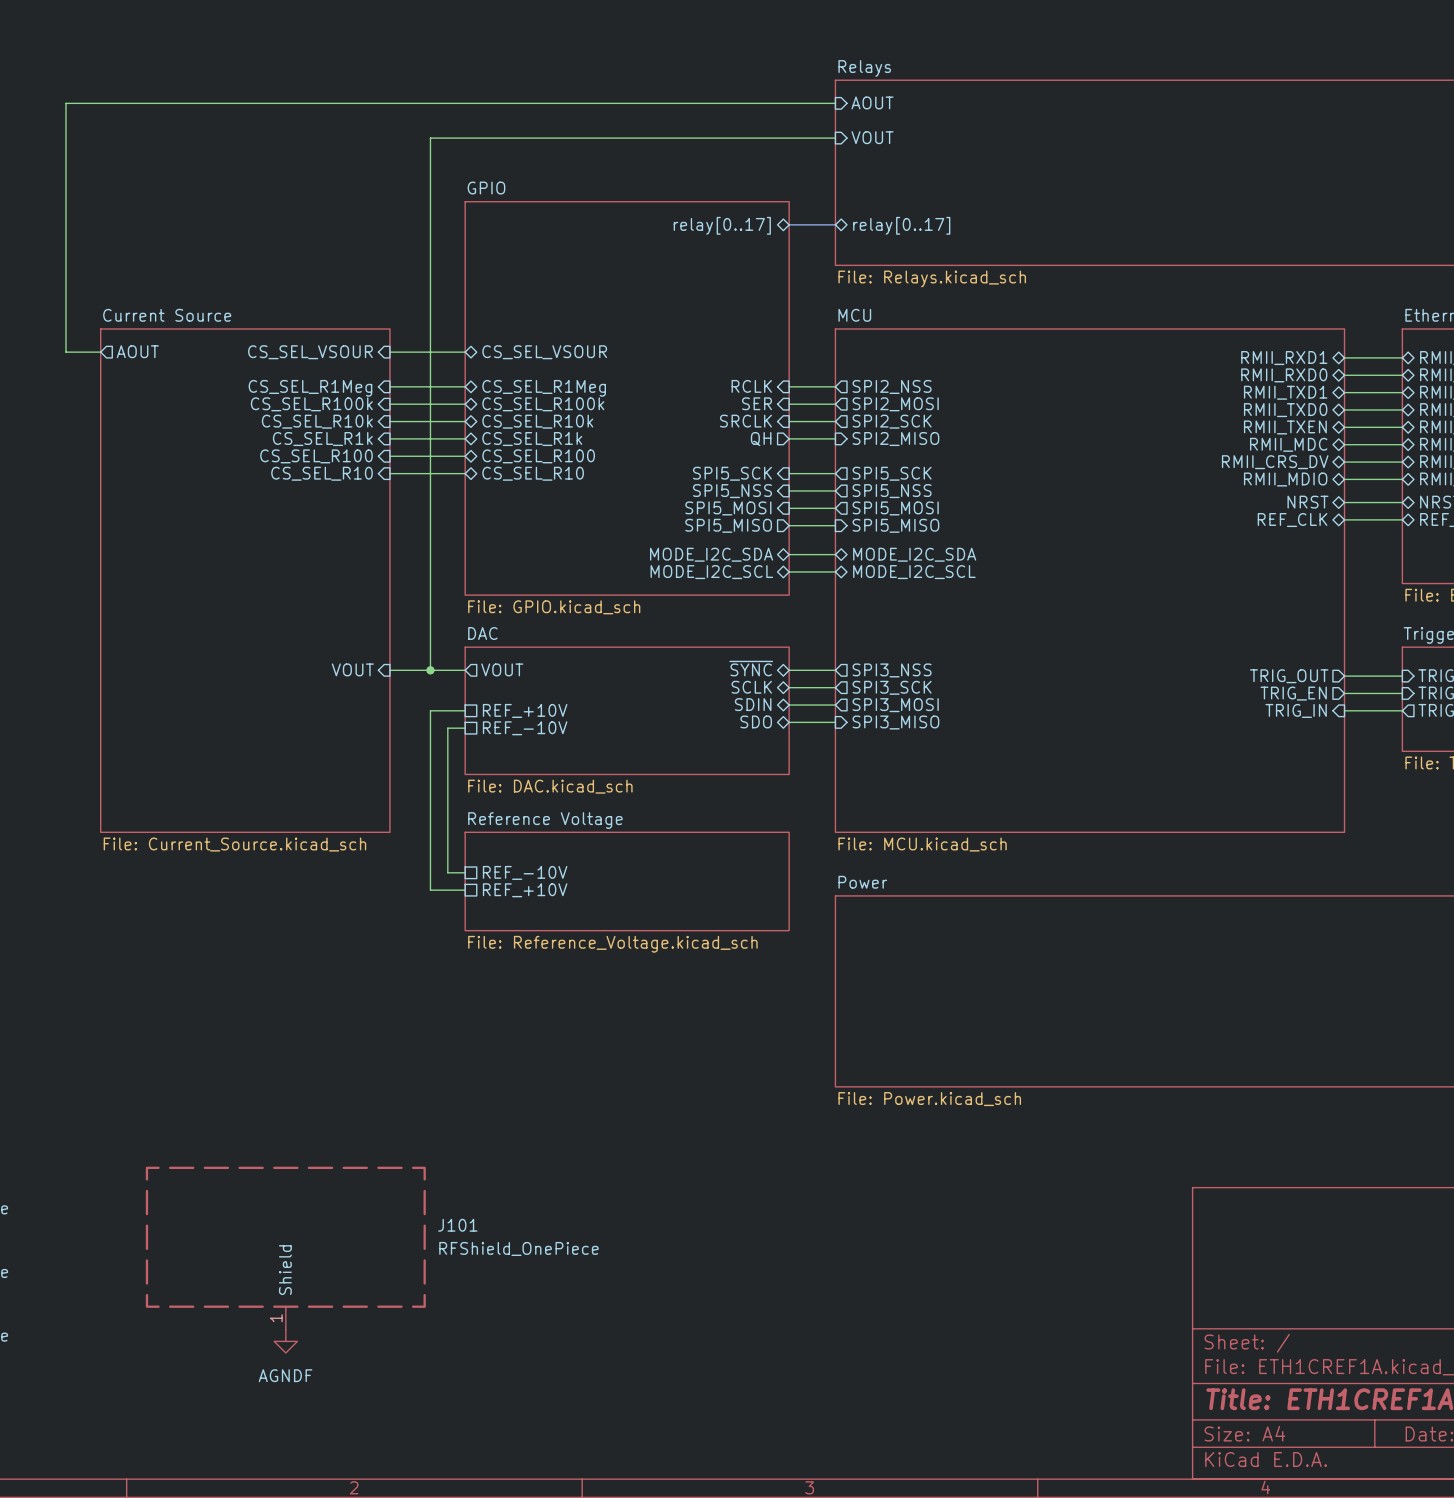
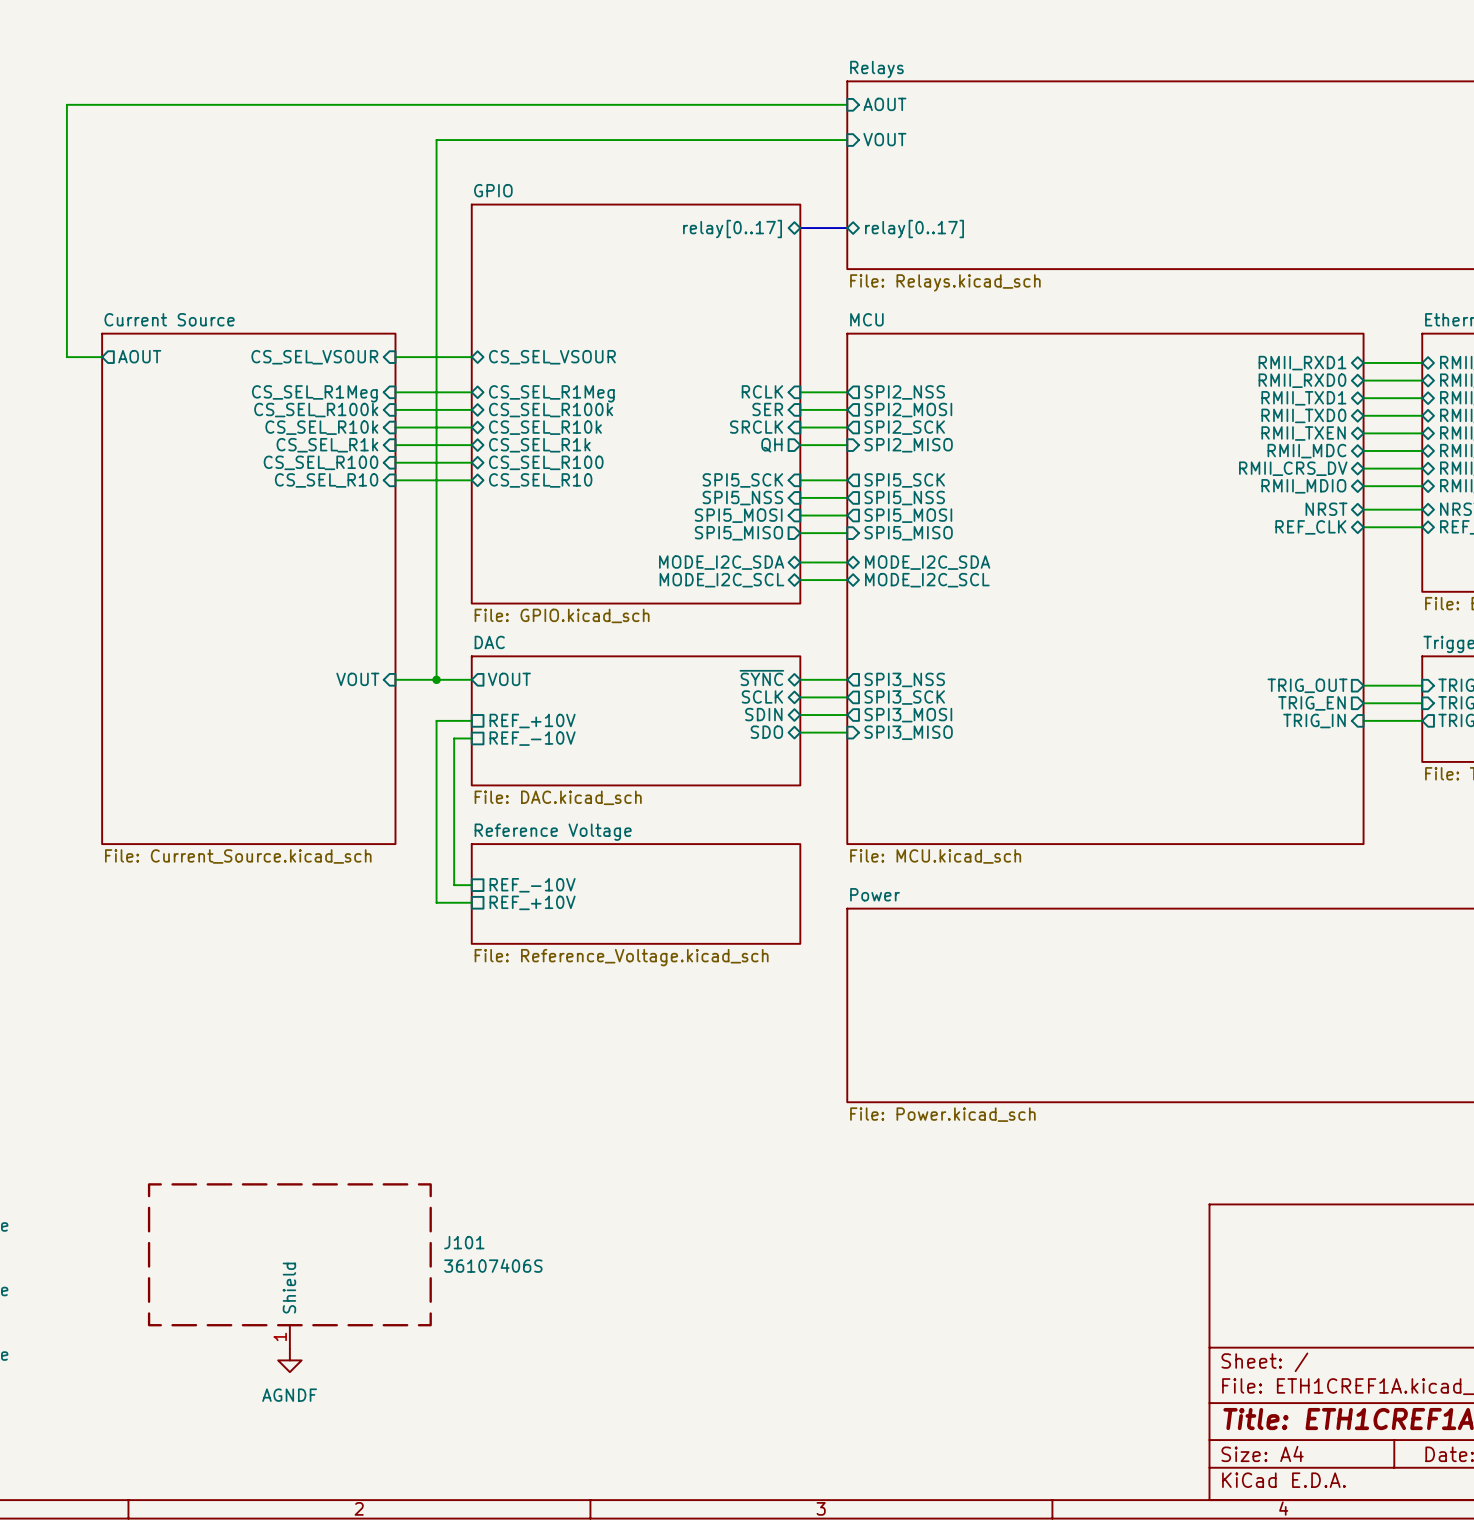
J101 value: RFShield_OnePiece (518, 1248) -> 36107406S (493, 1265)

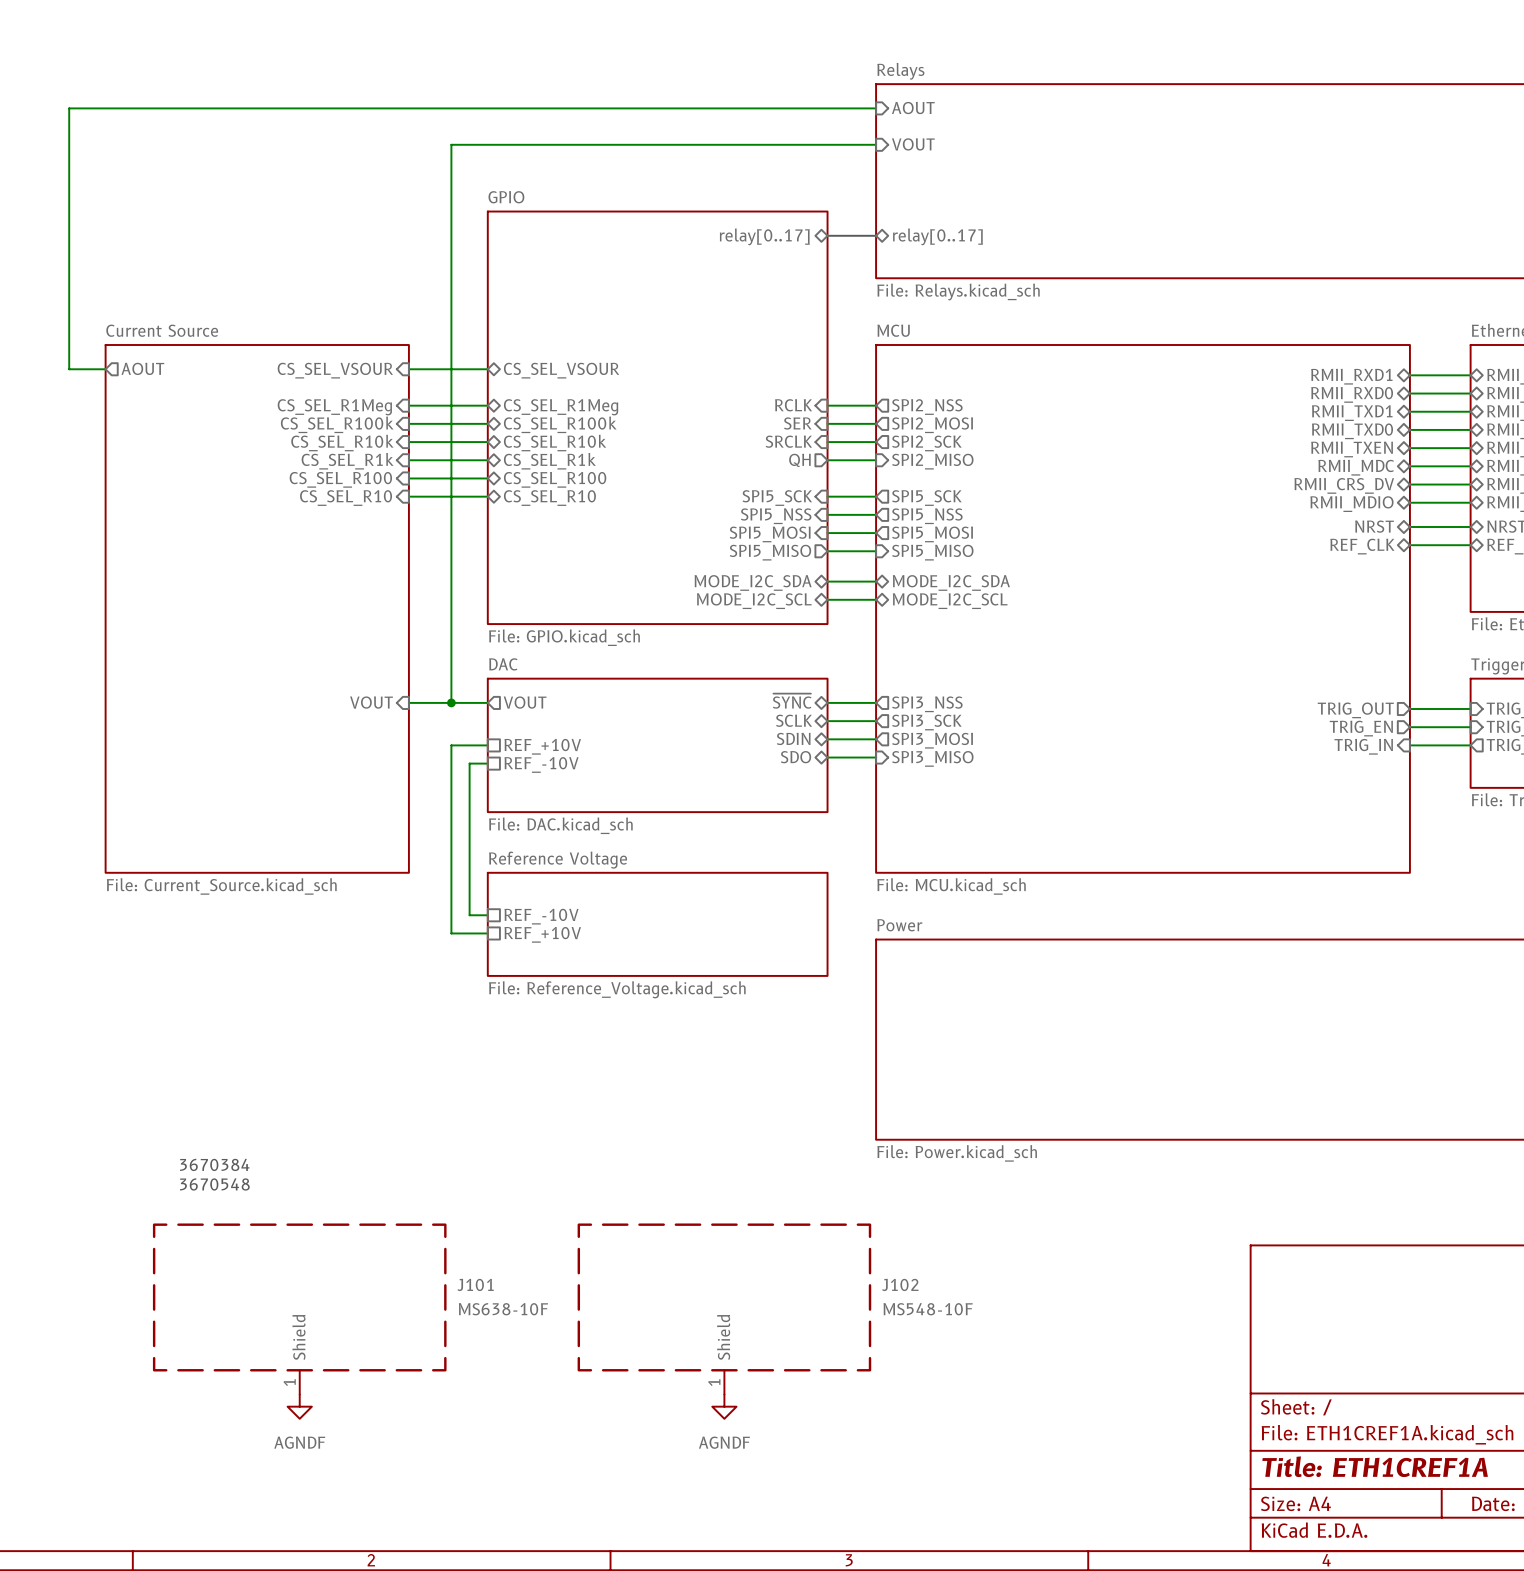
text: none -> 3670384 (214, 1164)
text: none -> 3670548 (214, 1184)
J101 value: 36107406S (493, 1265) -> MS638-10F (503, 1309)
J102: none -> MS548-10F (724, 1309)
power symbol: none -> AGNDF (724, 1406)

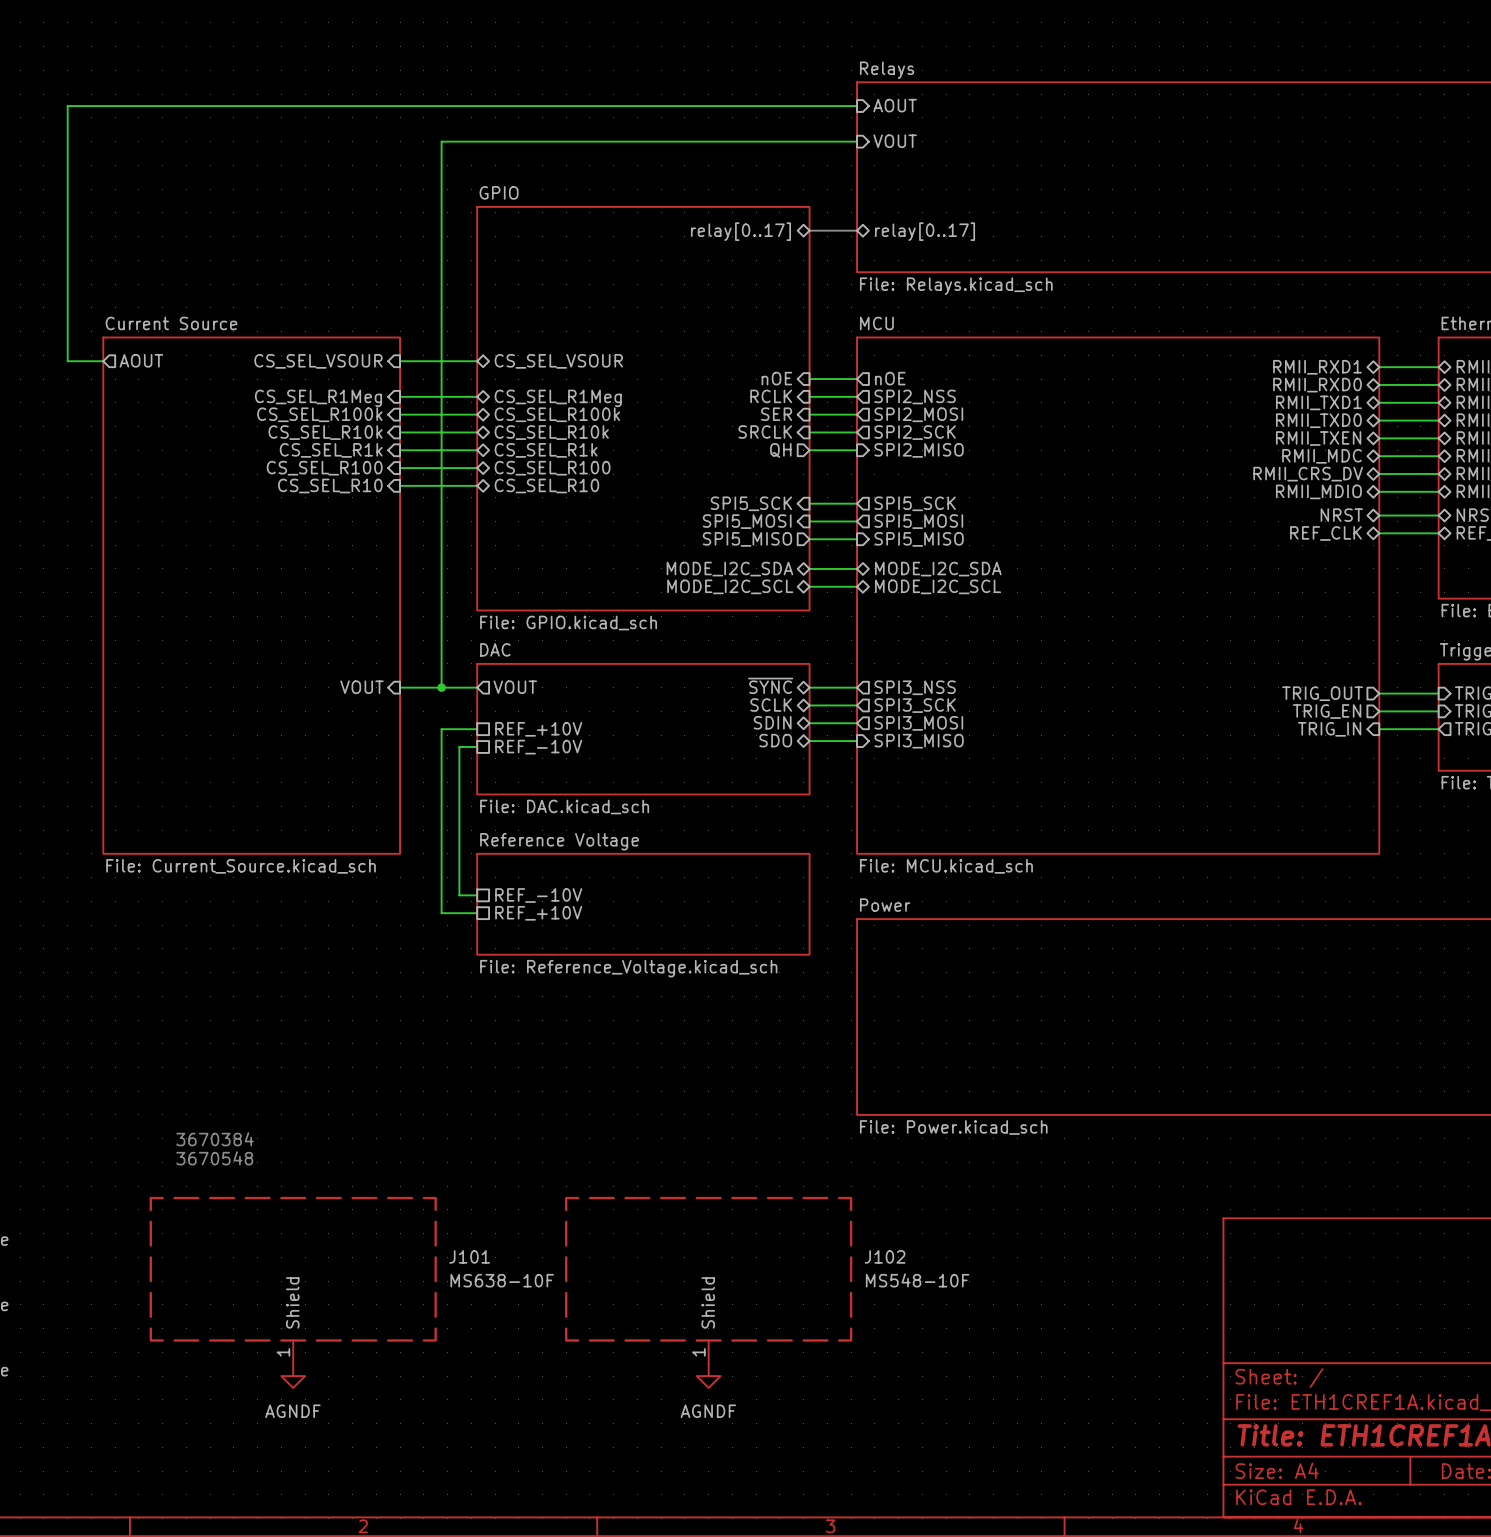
sheet pin: none -> nOE (776, 378)
sheet pin: none -> nOE (890, 378)
wire: (827, 496) (876, 496) -> (809, 379) (857, 379)
sheet pin: SPI5_SCK (777, 498) -> none
sheet pin: SPI5_SCK (926, 498) -> none
sheet pin: SPI5_NSS (776, 516) -> SPI5_SCK (751, 503)
sheet pin: SPI5_NSS (927, 516) -> SPI5_SCK (915, 503)

